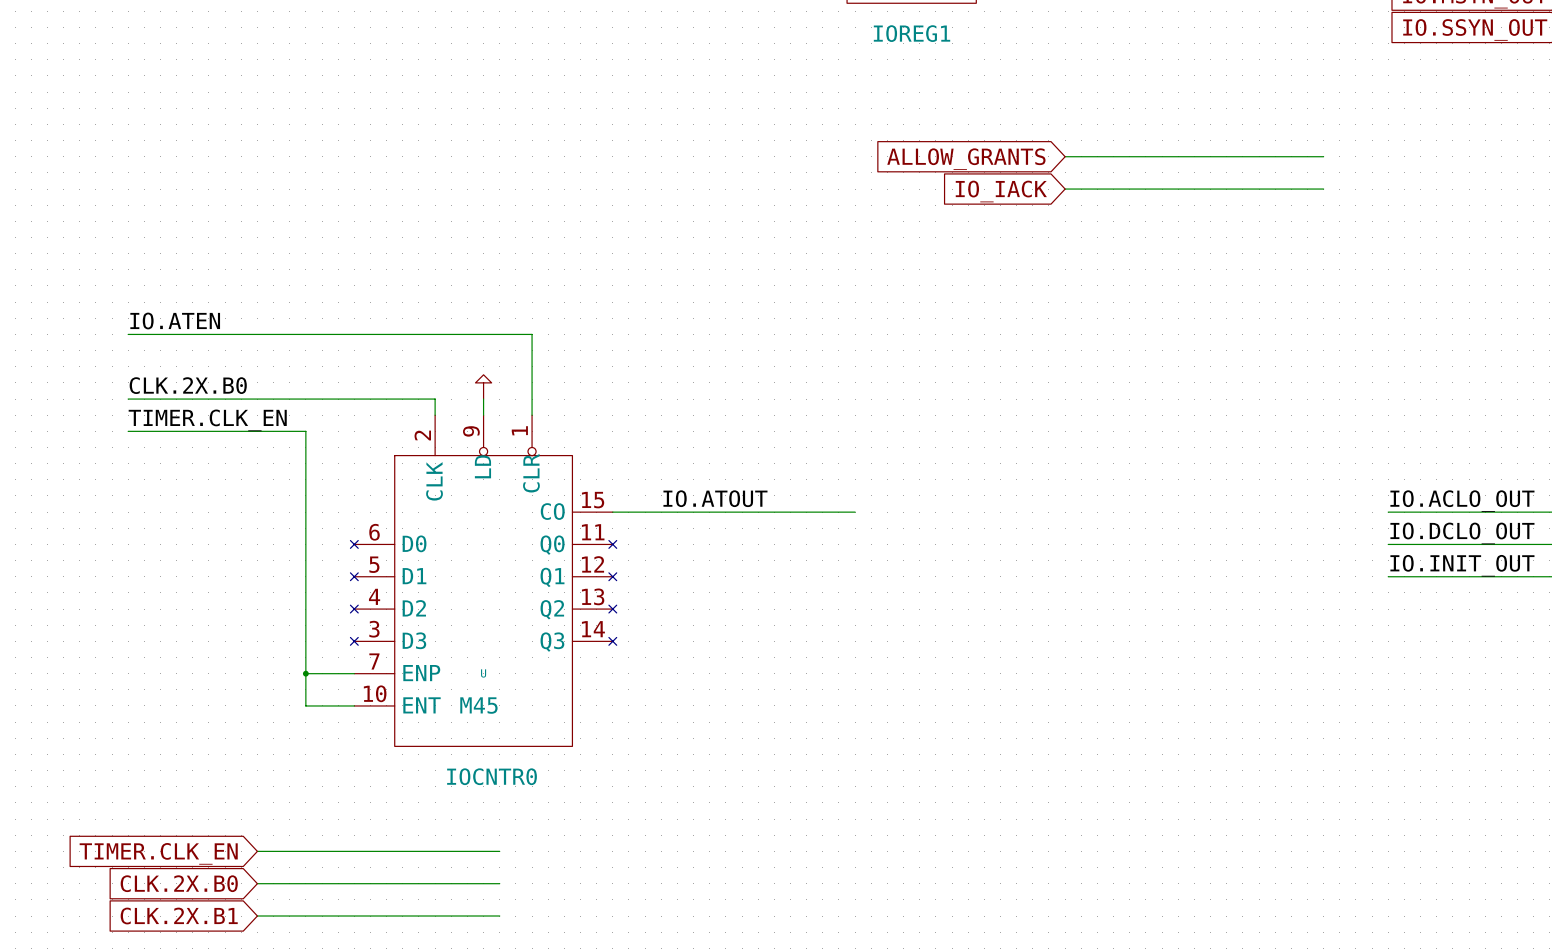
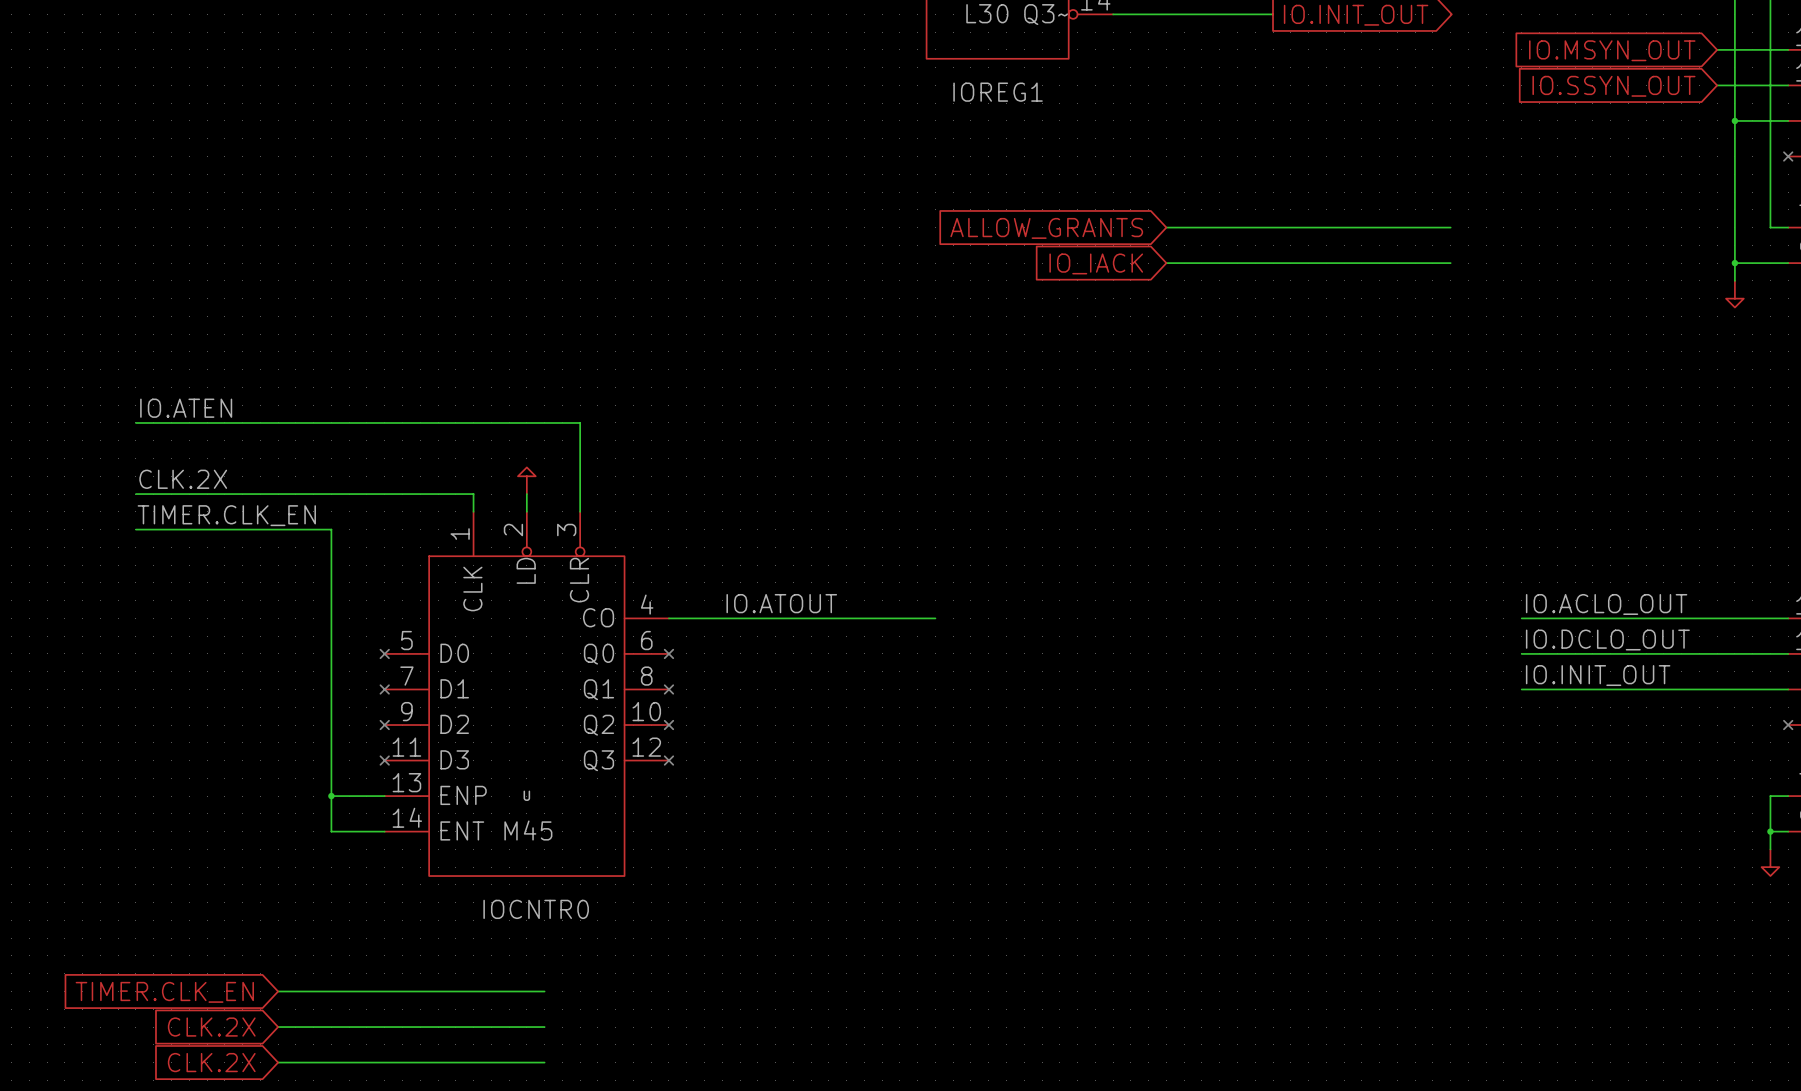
label: CLK.2X.B0 (188, 385) -> CLK.2X (183, 479)
U symbol: [354, 415, 613, 747] -> [384, 511, 669, 877]
global label: CLK.2X.B0 (179, 883) -> CLK.2X (211, 1027)
global label: CLK.2X.B1 (179, 916) -> CLK.2X (211, 1062)

